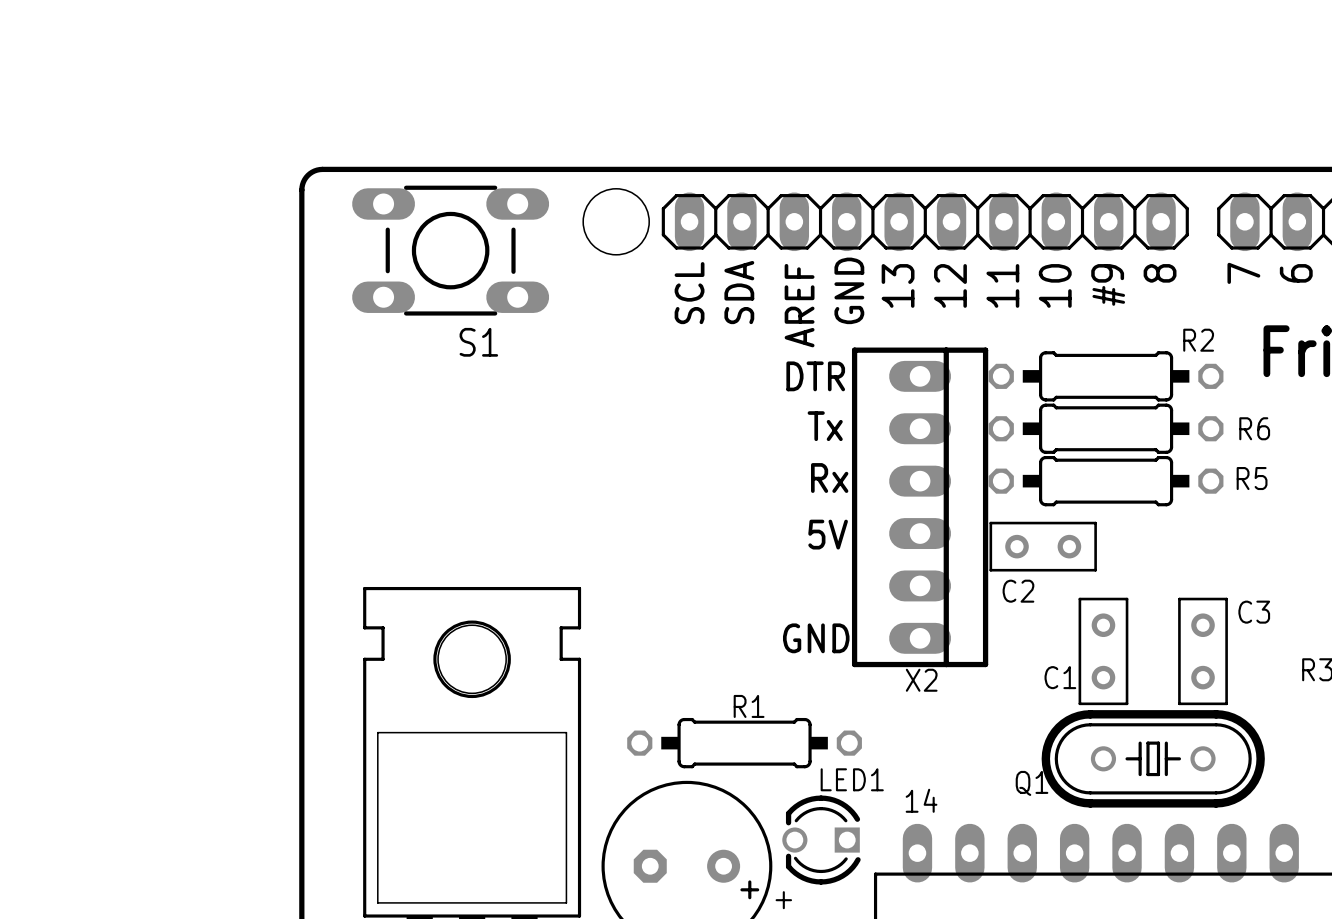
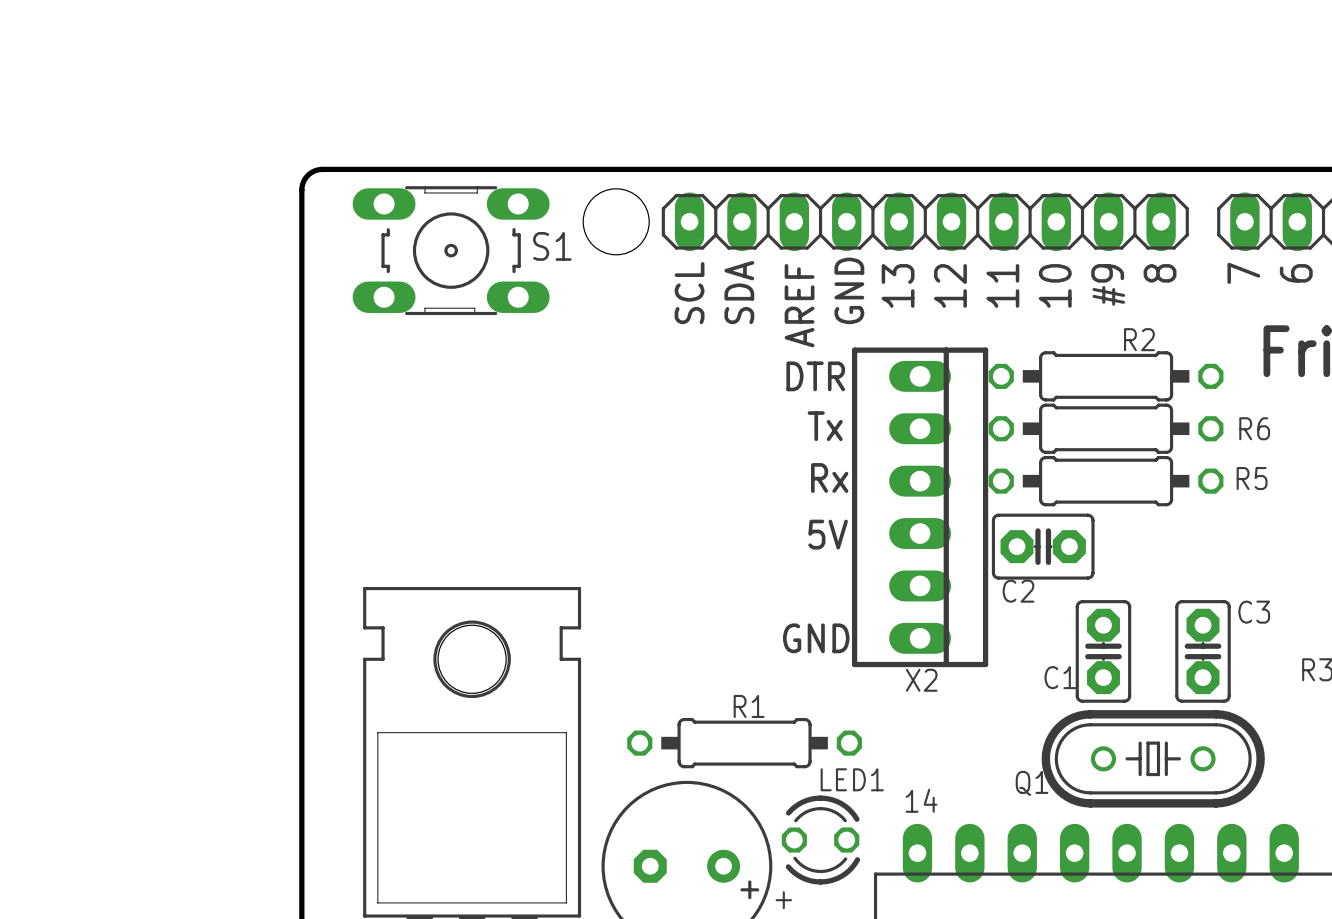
S1 footprint: [352, 185, 550, 316] -> [352, 186, 550, 316]
text position: R2 (1198, 340) -> R2 (1139, 339)
S1 name position: S1 (478, 342) -> S1 (552, 246)
part footprint: [989, 521, 1097, 572] -> [991, 513, 1095, 580]
part footprint: [1078, 597, 1129, 706] -> [1075, 600, 1132, 703]
part footprint: [1178, 597, 1228, 706] -> [1175, 600, 1231, 703]
part footprint: [782, 795, 861, 885] -> [781, 795, 861, 885]

